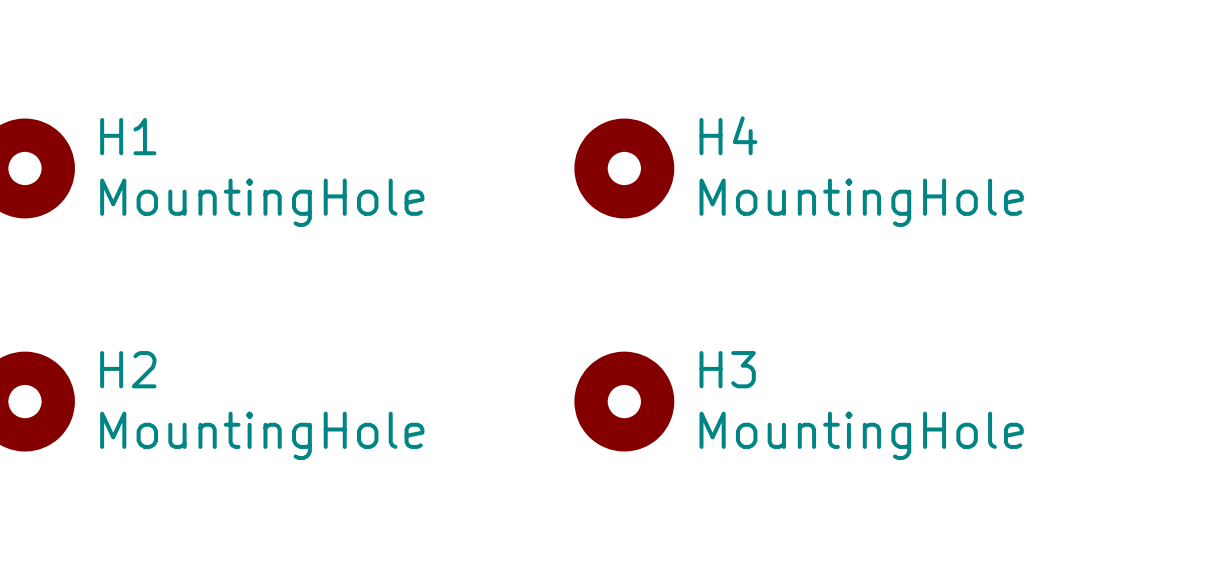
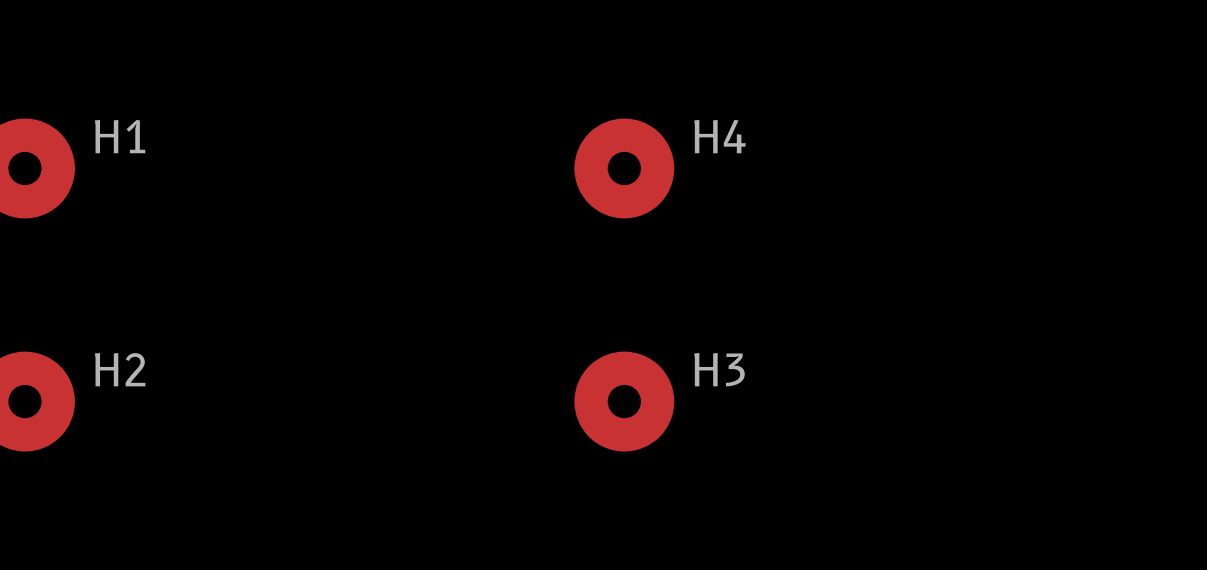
H1 value: MountingHole (262, 202) -> none
H4 value: MountingHole (861, 202) -> none
H2 value: MountingHole (262, 435) -> none
H3 value: MountingHole (861, 435) -> none

